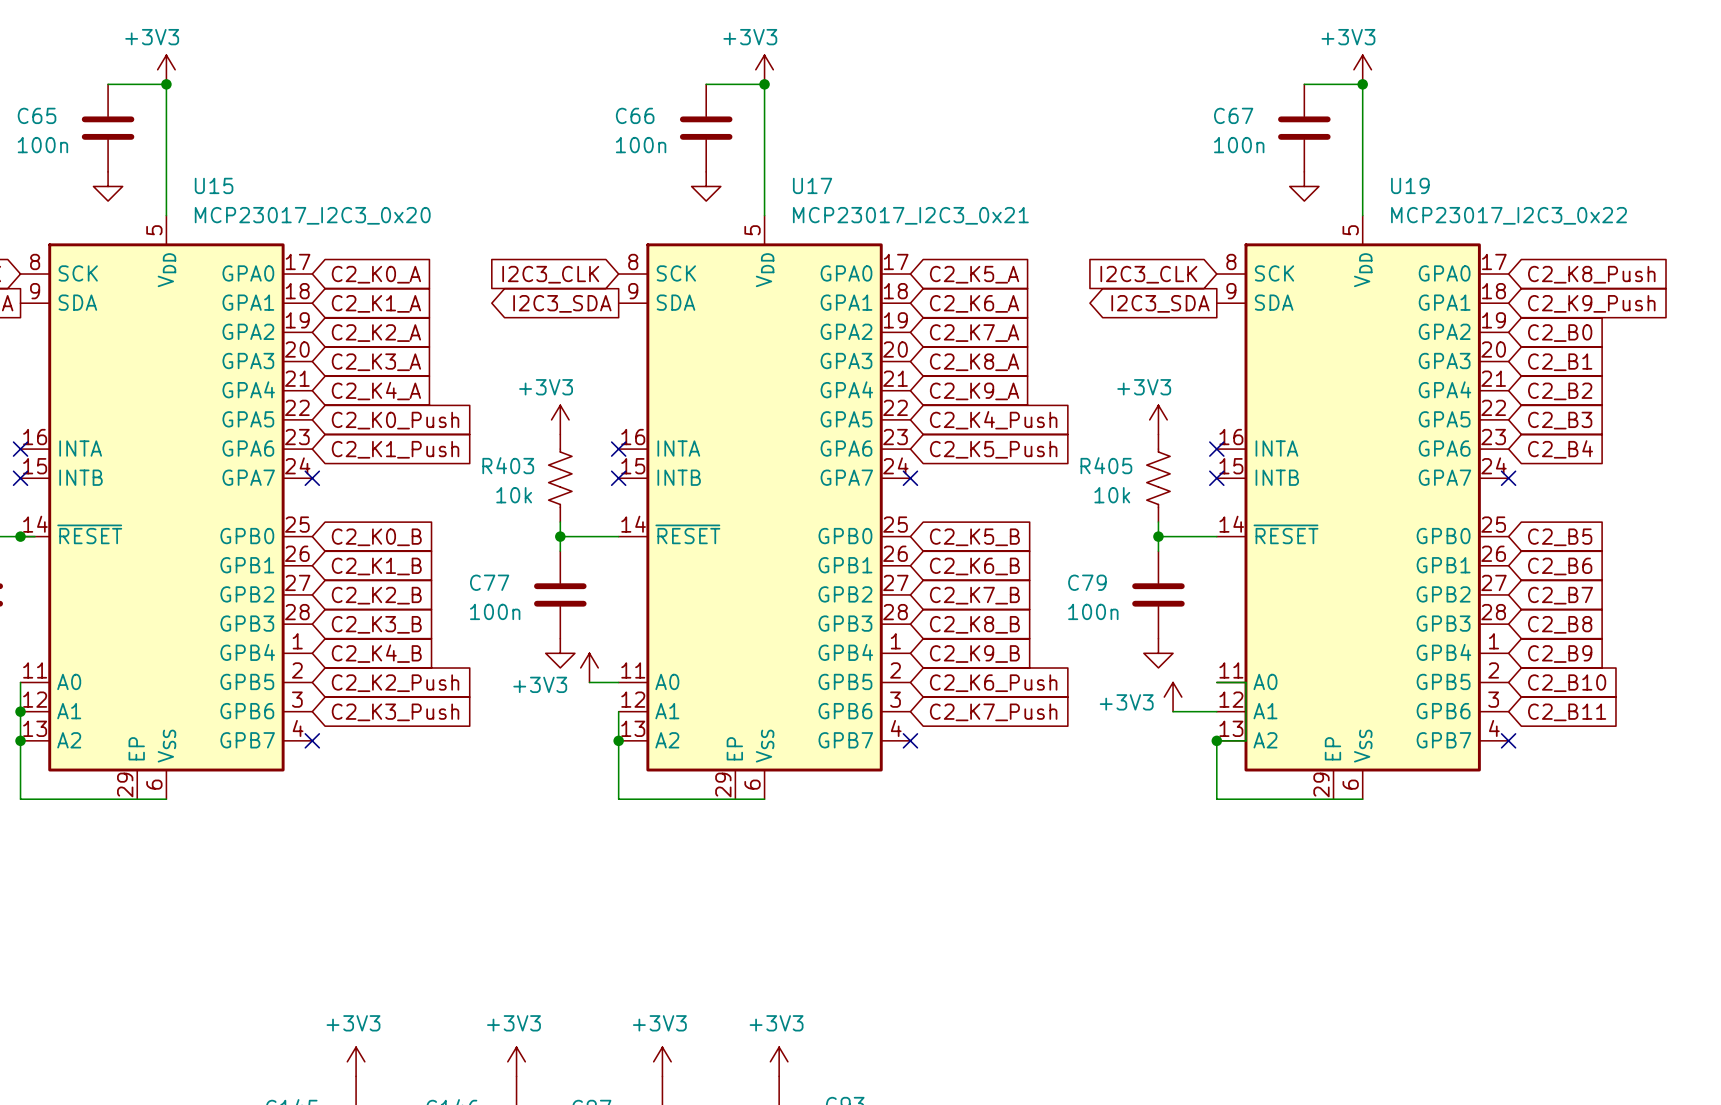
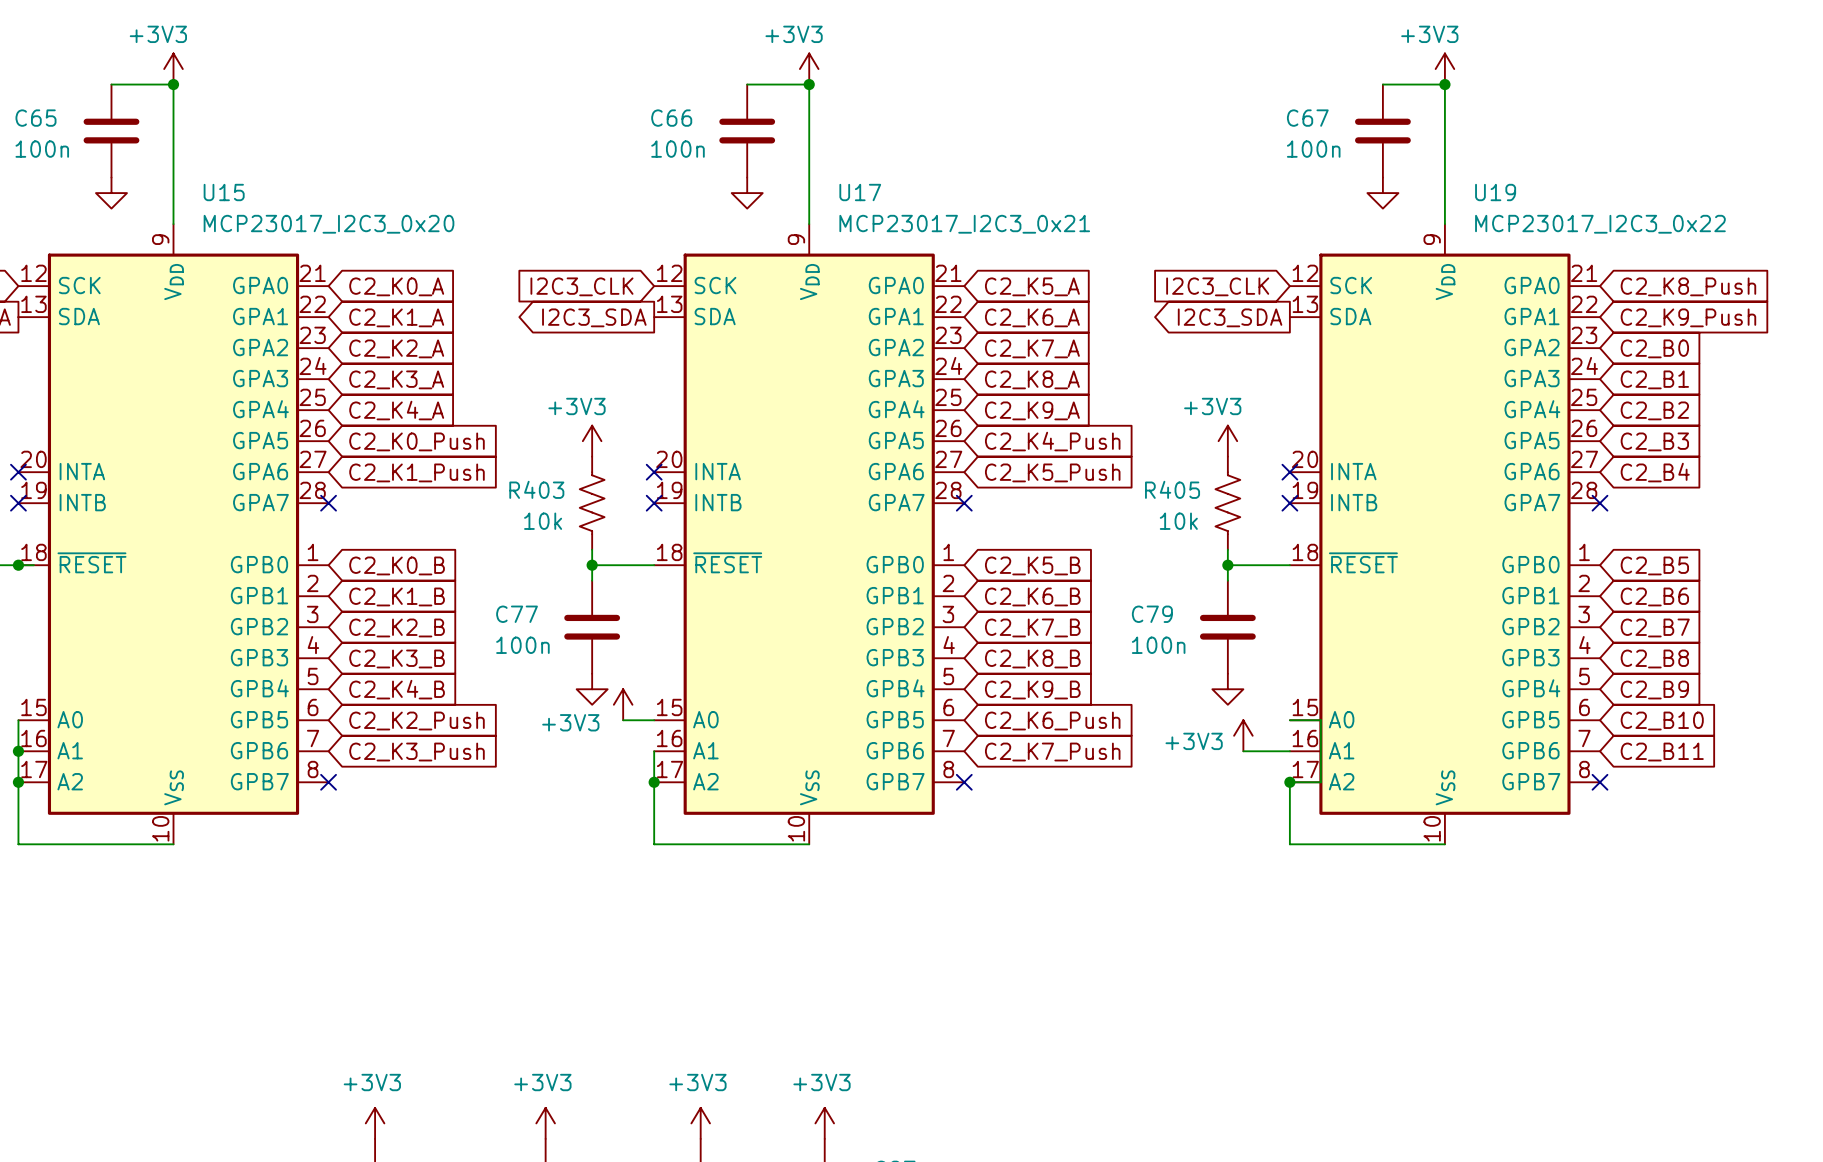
U15 symbol: [20, 215, 313, 800] -> [18, 224, 329, 845]
U17 symbol: [618, 215, 911, 800] -> [654, 224, 965, 845]
U19 symbol: [1216, 215, 1509, 800] -> [1289, 224, 1601, 845]

